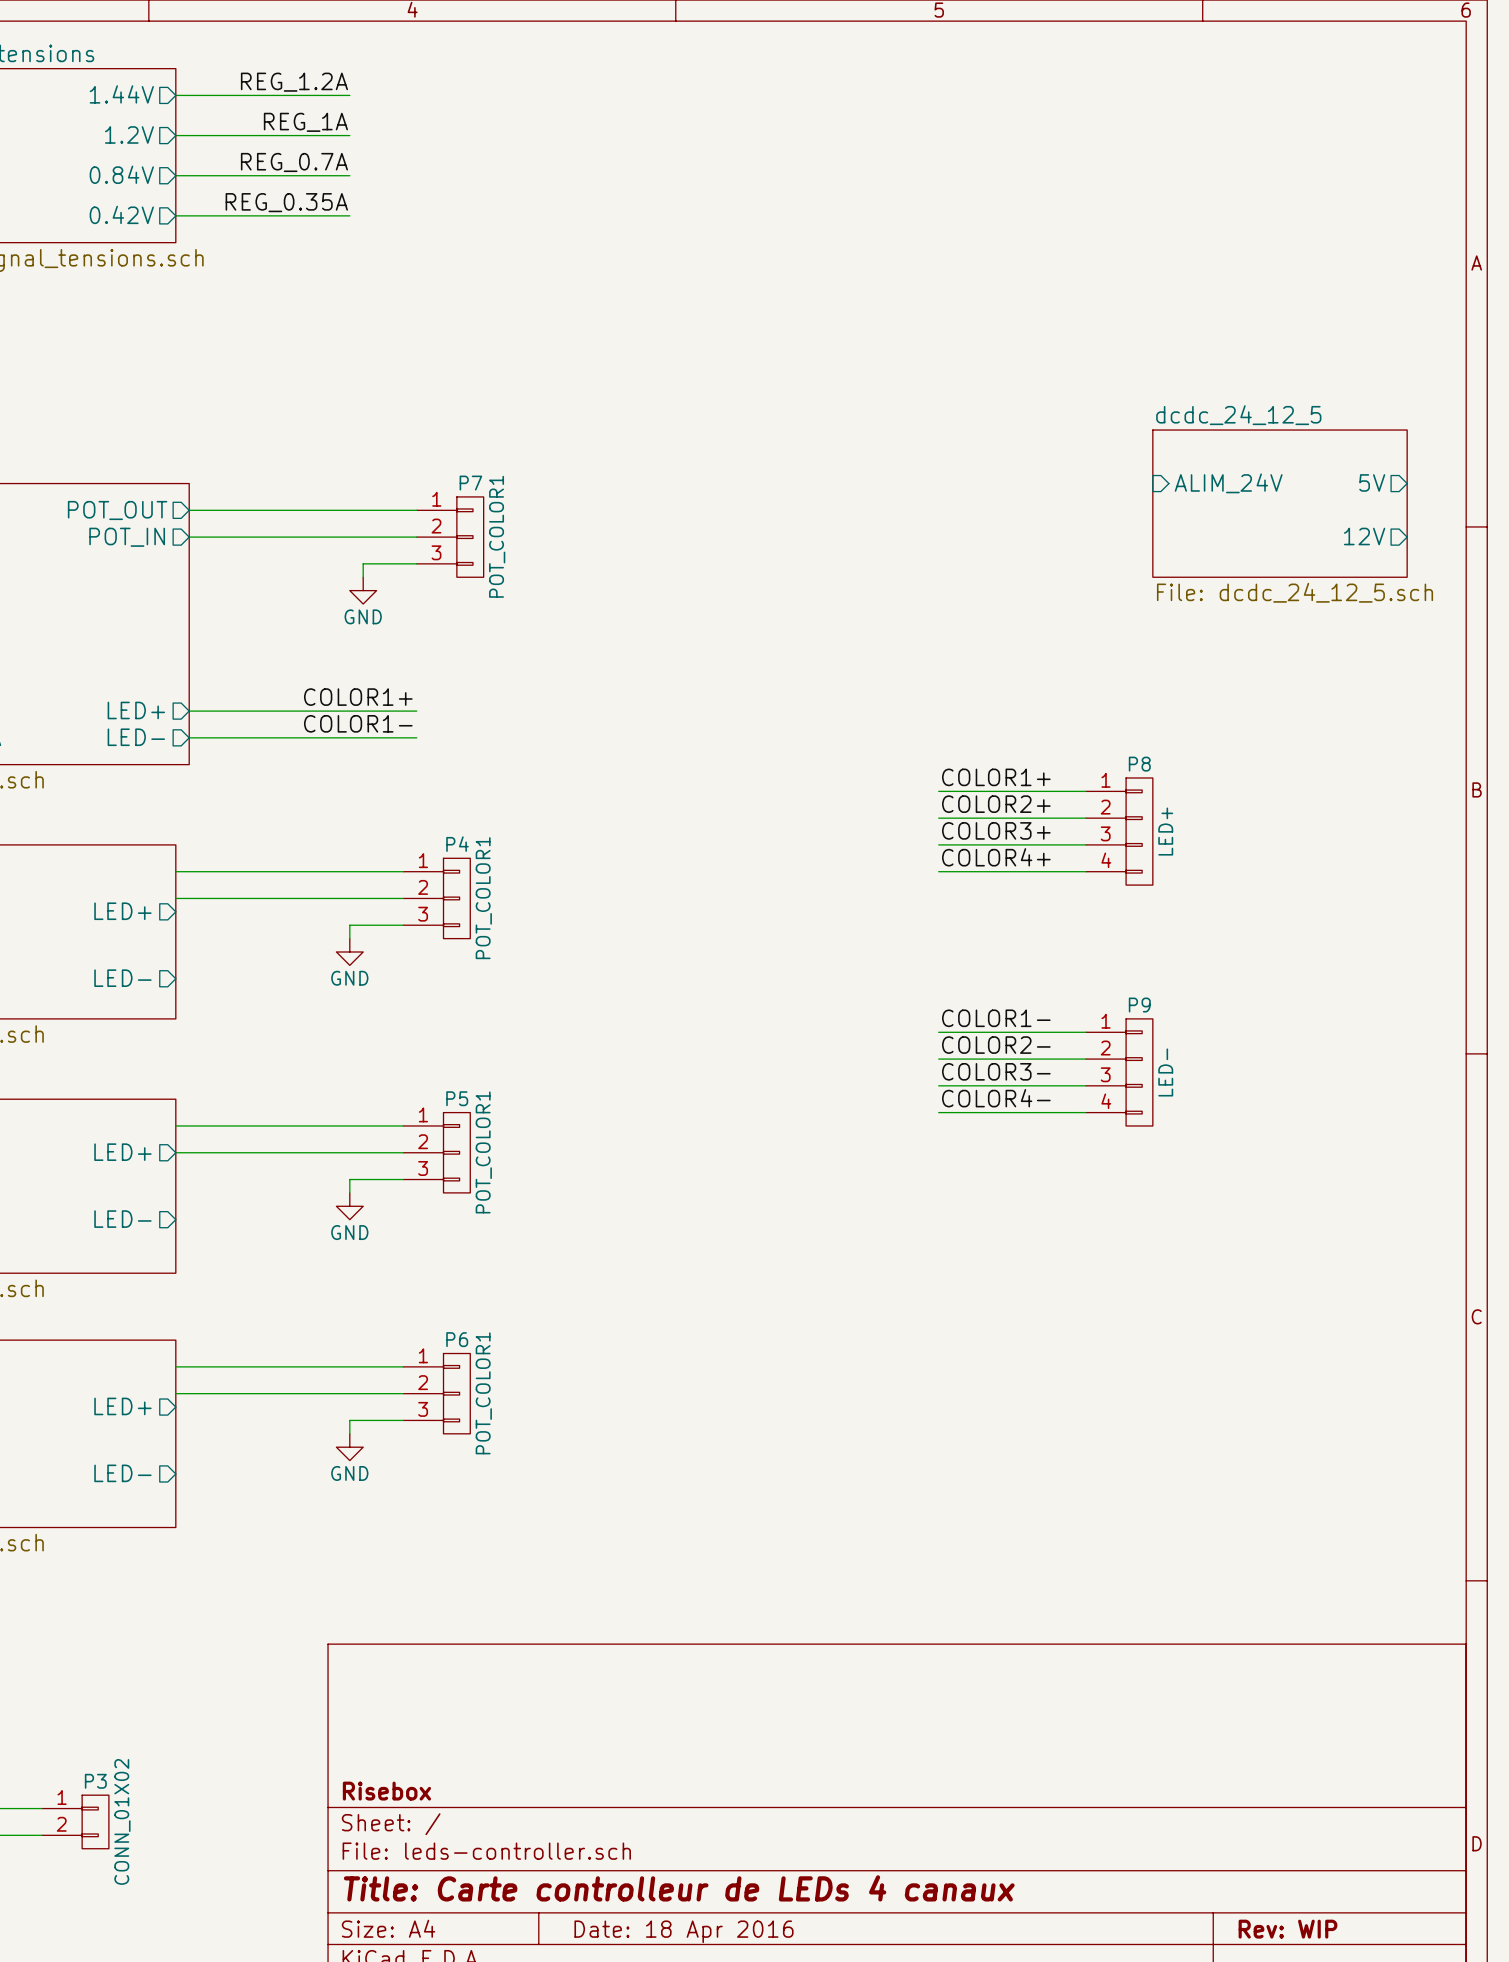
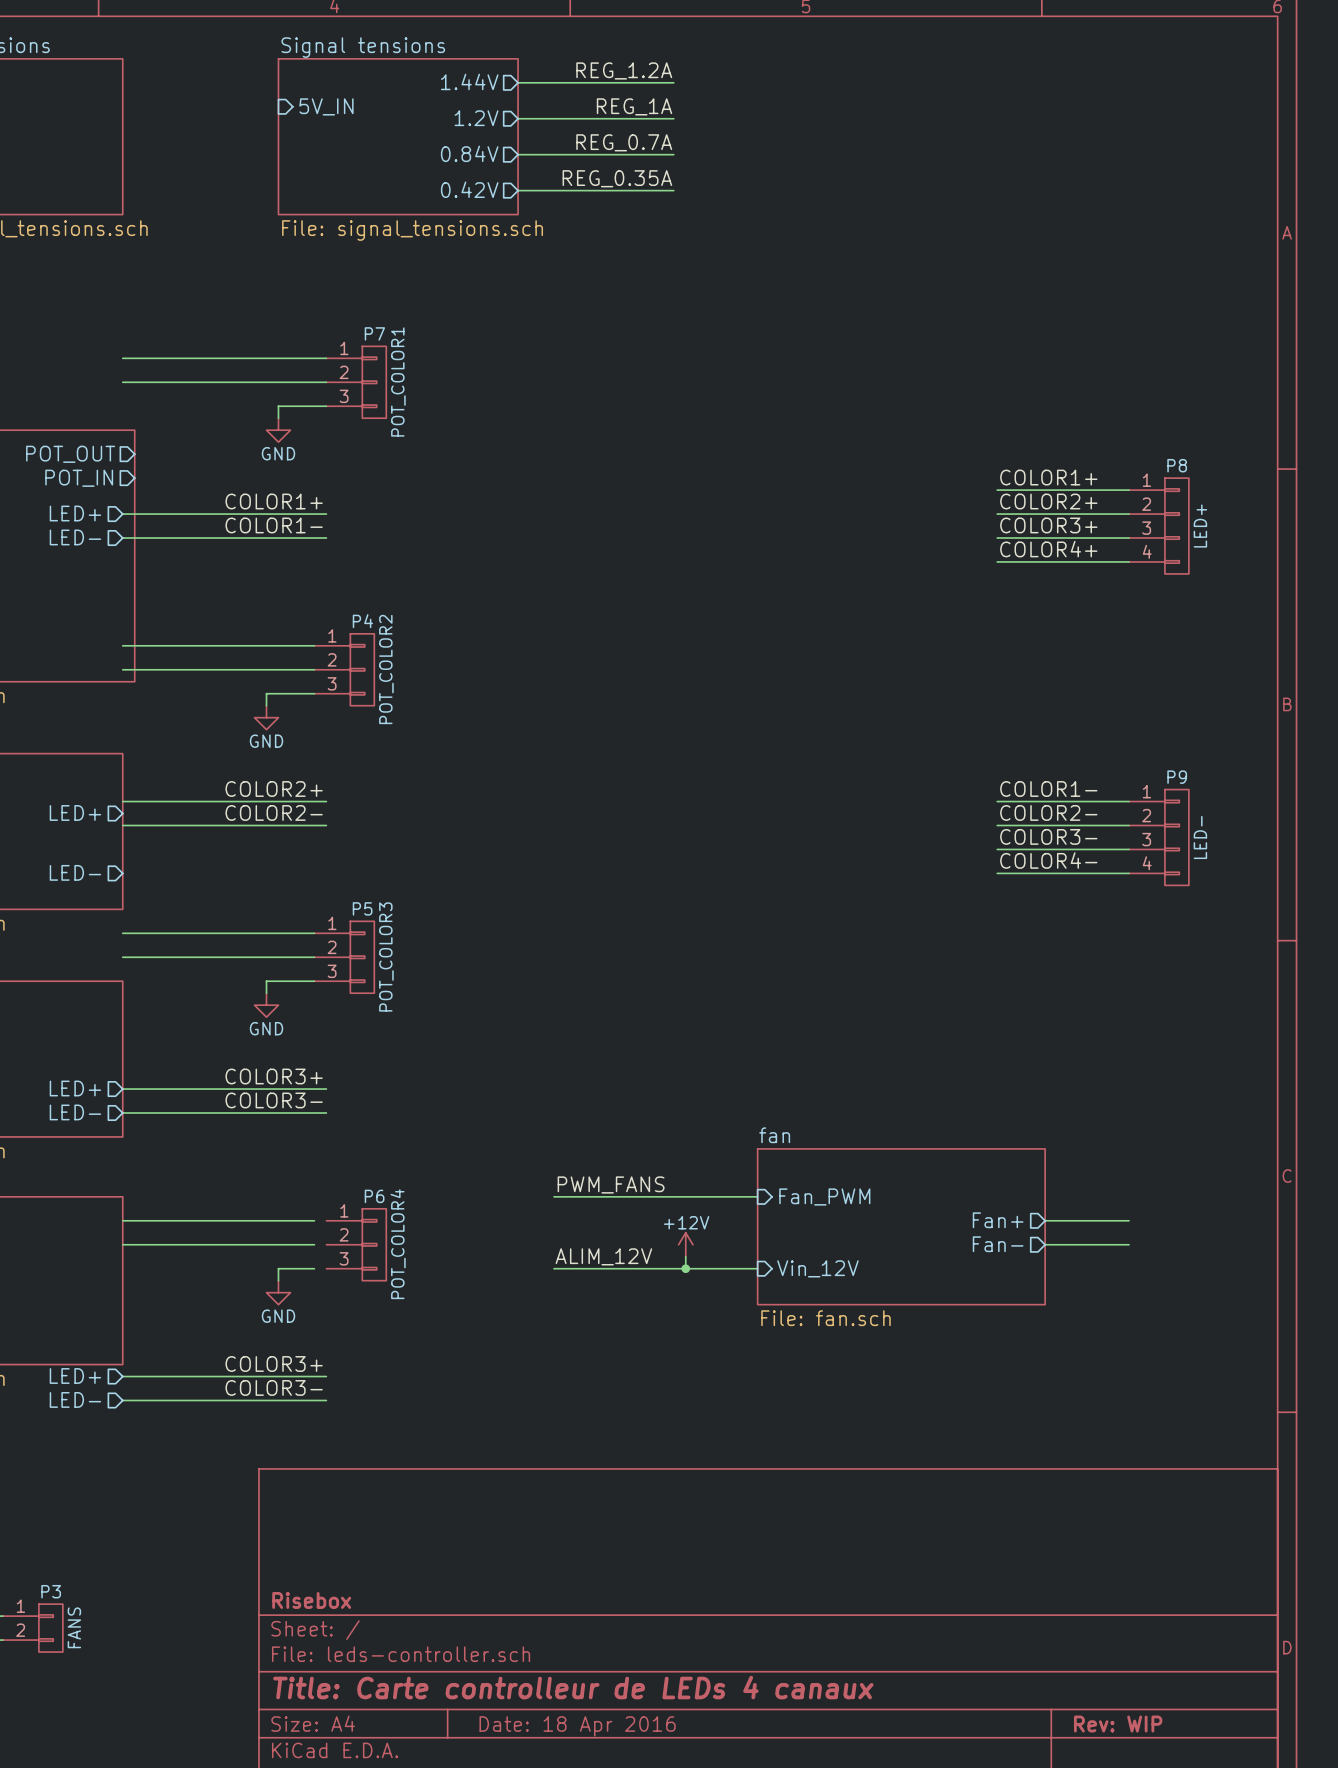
label: REG_1.2A (294, 82) -> none
label: none -> REG_1.2A (624, 70)
sheet pin: 1.44V (121, 94) -> none
sheet pin: none -> 1.44V (469, 81)
wire: (175, 95) (349, 95) -> none
wire: none -> (518, 82) (673, 82)
label: REG_1A (305, 122) -> none
sheet pin: none -> 5V_IN (326, 106)
label: none -> REG_1A (634, 106)
sheet pin: 1.2V (129, 134) -> none
sheet pin: none -> 1.2V (476, 118)
wire: (175, 135) (349, 135) -> none
wire: none -> (518, 118) (673, 118)
sheet Signal tensions: none -> File: signal_tensions.sch (398, 136)
label: REG_0.7A (294, 162) -> none
label: none -> REG_0.7A (624, 142)
sheet pin: 0.84V (121, 174) -> none
sheet pin: none -> 0.84V (469, 153)
wire: (175, 175) (349, 175) -> none
wire: none -> (518, 154) (673, 154)
label: REG_0.35A (286, 202) -> none
label: none -> REG_0.35A (617, 178)
sheet pin: 0.42V (121, 214) -> none
sheet pin: none -> 0.42V (469, 189)
wire: (175, 215) (349, 215) -> none
wire: none -> (518, 190) (673, 190)
sheet pin: 5V (1372, 482) -> none
power symbol: none -> GND (278, 430)
sheet pin: ALIM_24V (1228, 483) -> none
sheet dcdc_24_12_5: File: dcdc_24_12_5.sch (1279, 503) -> none
wire: (189, 510) (416, 510) -> (122, 382) (326, 382)
label: none -> COLOR1+ (1048, 477)
sheet pin: 12V (1364, 536) -> none
wire: (189, 537) (416, 537) -> (122, 358) (326, 358)
P7 position: (450, 537) -> (356, 382)
wire: none -> (997, 490) (1128, 490)
wire: (416, 563) (363, 563) (363, 577) -> (326, 406) (278, 406) (278, 418)
label: none -> COLOR2+ (1048, 501)
power symbol: GND (363, 590) -> none
label: none -> COLOR3+ (1048, 525)
wire: none -> (997, 538) (1128, 538)
label: none -> COLOR4+ (1048, 549)
wire: none -> (997, 561) (1128, 561)
label position: COLOR1+ (358, 697) -> COLOR1+ (274, 501)
sheet pin position: LED+ (136, 710) -> LED+ (75, 513)
wire: (189, 711) (416, 711) -> (122, 514) (326, 514)
label position: COLOR1- (358, 723) -> COLOR1- (274, 525)
wire: none -> (122, 645) (314, 645)
sheet pin position: LED- (136, 737) -> LED- (75, 537)
wire: (189, 737) (416, 737) -> (122, 538) (326, 538)
wire: none -> (122, 669) (314, 669)
label: COLOR1+ (996, 777) -> none
wire: none -> (314, 693) (266, 693) (266, 705)
wire: (938, 791) (1085, 791) -> (997, 801) (1128, 801)
power symbol: none -> GND (266, 717)
label: COLOR2+ (996, 804) -> none
wire: (938, 818) (1085, 818) -> (997, 825) (1128, 825)
label: COLOR3+ (996, 830) -> none
P8 position: (1119, 831) -> (1158, 526)
wire: (938, 844) (1085, 844) -> (997, 849) (1128, 849)
label: COLOR4+ (996, 857) -> none
wire: (175, 871) (403, 871) -> none
wire: (938, 871) (1085, 871) -> (997, 873) (1128, 873)
label: none -> COLOR2+ (274, 789)
P4 position: (436, 898) -> (344, 669)
P4 value: POT_COLOR1 (483, 898) -> POT_COLOR2 (386, 669)
label: none -> COLOR2- (274, 812)
wire: (349, 925) (349, 938) -> (278, 825) (122, 825)
power symbol: GND (349, 951) -> none
label position: COLOR1- (996, 1018) -> COLOR1- (1048, 789)
wire: (938, 1032) (1085, 1032) -> none
wire: none -> (122, 933) (314, 933)
label position: COLOR2- (996, 1045) -> COLOR2- (1048, 812)
wire: (938, 1059) (1085, 1059) -> none
label position: COLOR3- (996, 1071) -> COLOR3- (1048, 836)
wire: none -> (122, 957) (314, 957)
P9 position: (1119, 1072) -> (1158, 837)
wire: (938, 1085) (1085, 1085) -> none
label position: COLOR4- (996, 1098) -> COLOR4- (1048, 860)
wire: (938, 1112) (1085, 1112) -> none
wire: (175, 1125) (403, 1125) -> (122, 1089) (326, 1089)
sheet pin: LED+ (122, 1152) -> none
wire: (175, 1152) (403, 1152) -> (122, 1112) (326, 1112)
P5 position: (436, 1152) -> (344, 957)
P5 value: POT_COLOR1 (483, 1152) -> POT_COLOR3 (386, 956)
wire: (403, 1179) (349, 1179) (349, 1192) -> (314, 981) (266, 981) (266, 993)
label: none -> COLOR3+ (274, 1076)
power symbol position: GND (349, 1206) -> GND (266, 1005)
sheet pin: LED- (122, 1219) -> LED+ (75, 1088)
label: none -> COLOR3- (274, 1100)
sheet pin: none -> LED- (75, 1112)
label: none -> PWM_FANS (611, 1184)
wire: none -> (553, 1196) (757, 1196)
sheet pin: none -> Fan_PWM (824, 1196)
wire: (389, 1366) (403, 1366) -> none
sheet pin: none -> Fan+ (998, 1220)
wire: none -> (1045, 1220) (1128, 1220)
sheet fan: none -> File: fan.sch (901, 1226)
wire: (389, 1393) (403, 1393) -> none
P6 value: POT_COLOR1 (483, 1393) -> POT_COLOR4 (398, 1244)
power symbol: none -> +12V (685, 1244)
sheet pin: none -> Fan- (998, 1244)
wire: none -> (1045, 1244) (1128, 1244)
sheet pin position: LED+ (122, 1406) -> LED+ (75, 1375)
label: none -> ALIM_12V (603, 1256)
wire: none -> (685, 1256) (685, 1268)
wire: (389, 1420) (403, 1420) -> none
wire: none -> (553, 1268) (757, 1268)
junction: none -> (685, 1268)
sheet pin: none -> Vin_12V (817, 1268)
sheet pin position: LED- (122, 1473) -> LED- (75, 1399)
label: none -> COLOR3+ (274, 1363)
wire: none -> (122, 1376) (326, 1376)
label: none -> COLOR3- (274, 1387)
wire: none -> (122, 1400) (326, 1400)
P3 value: CONN_01X02 (122, 1821) -> FANS (74, 1627)

